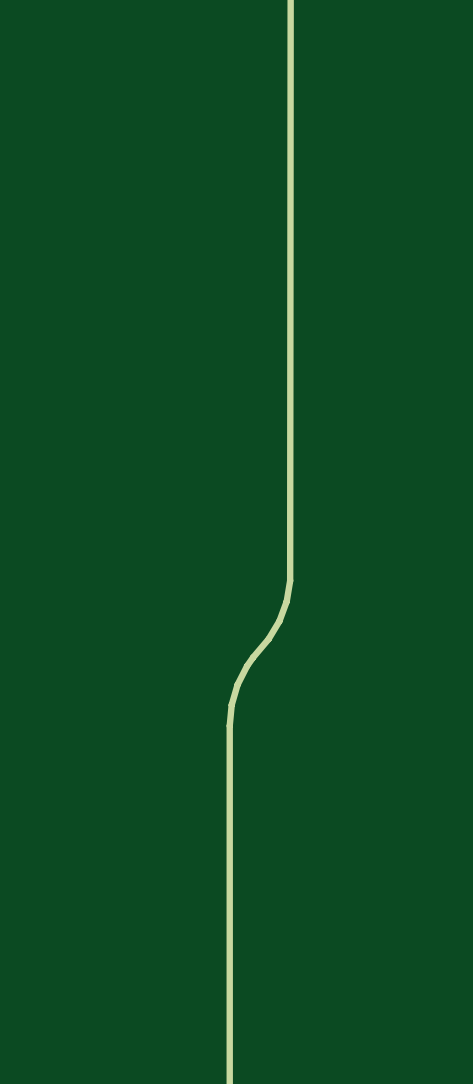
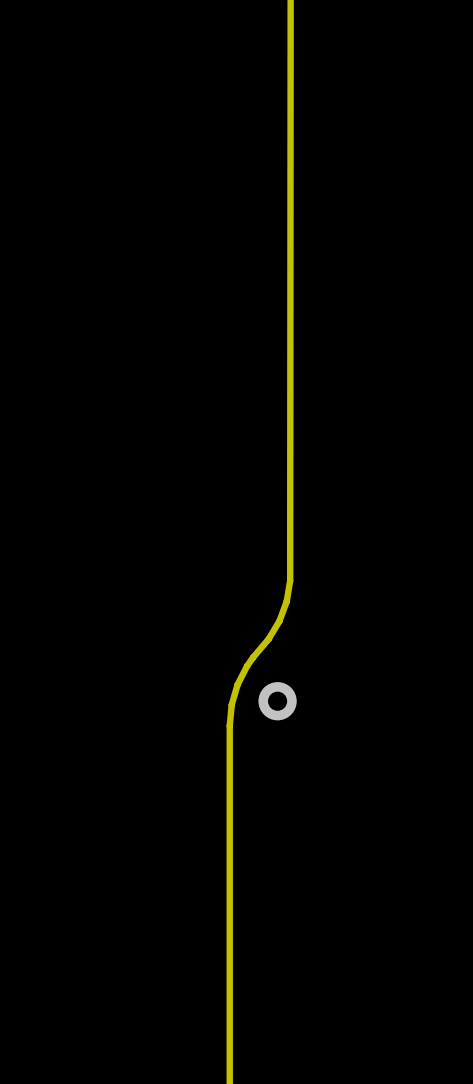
via: none -> (277, 701)

